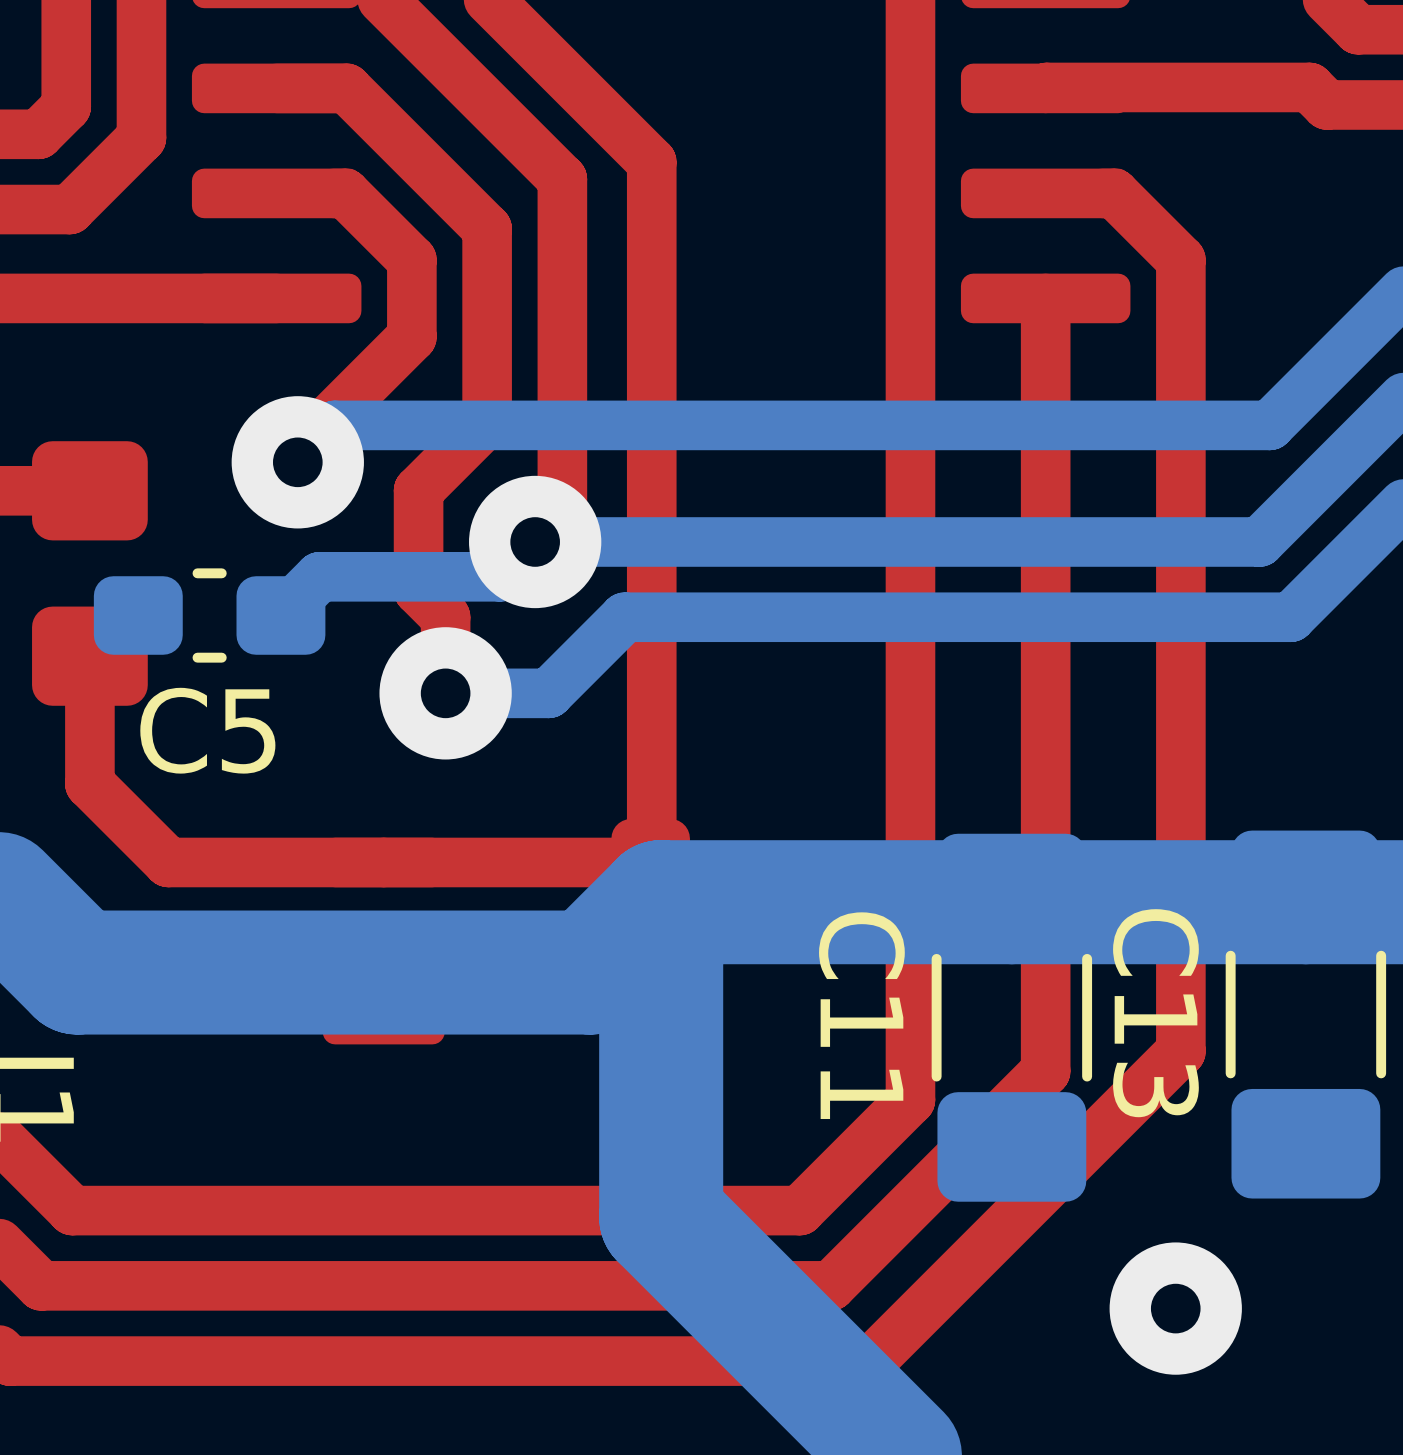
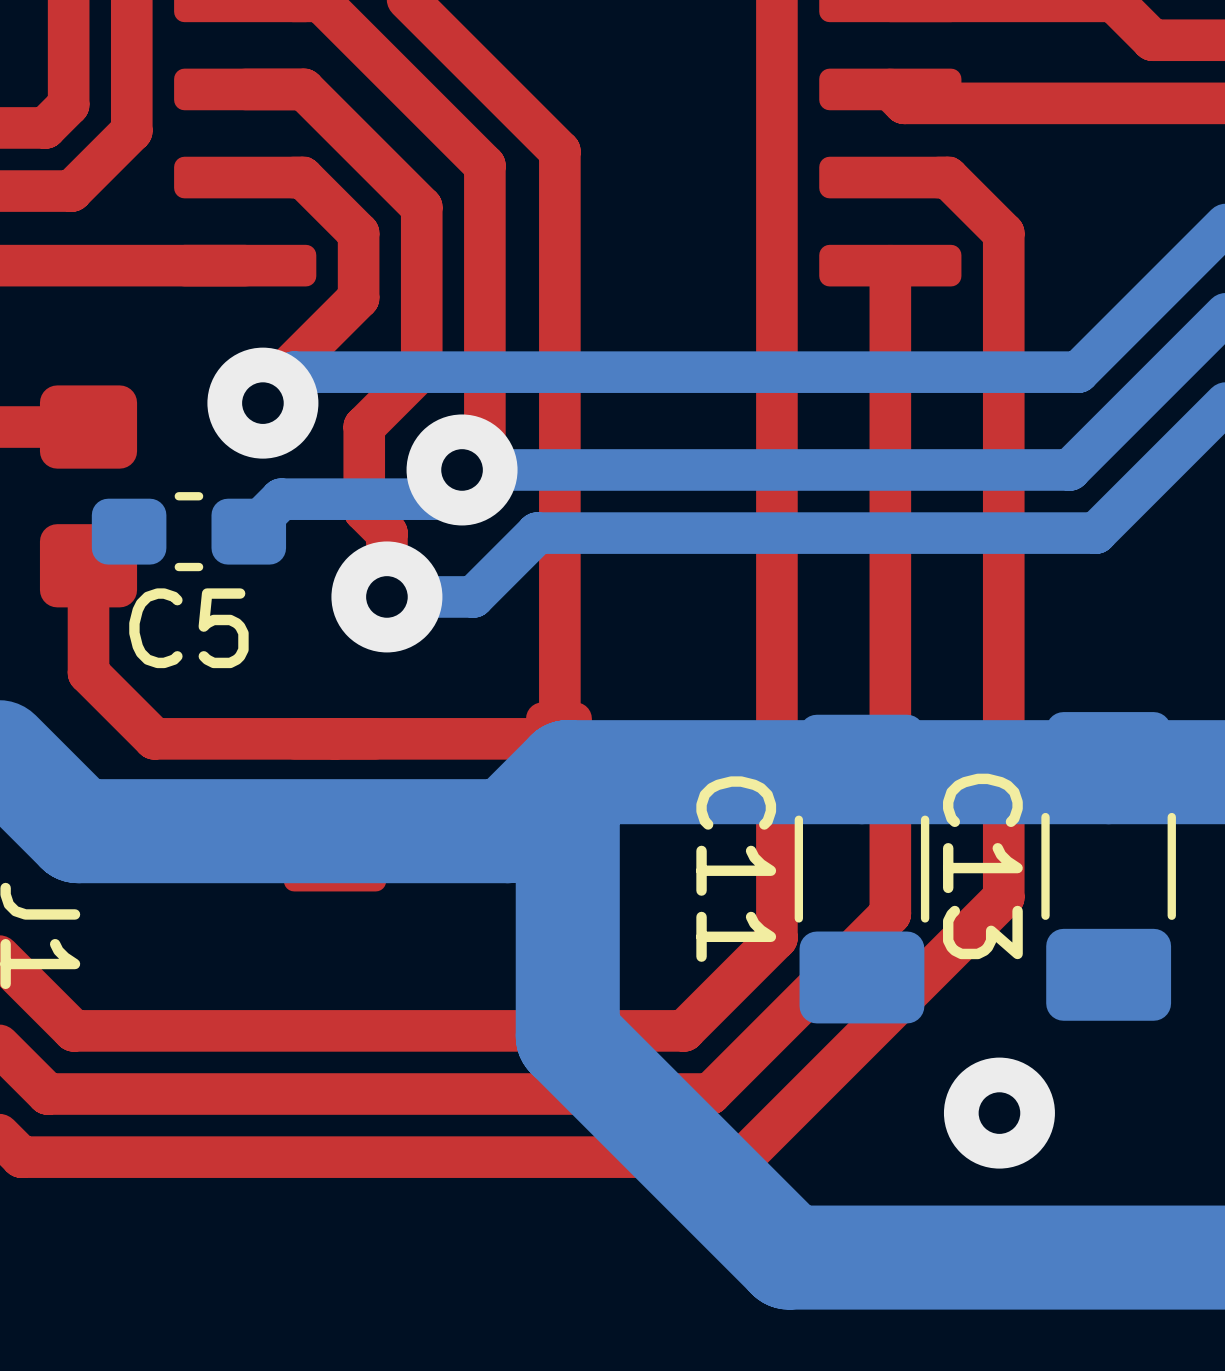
top track: (1046, 87) (1309, 87) (1327, 104) -> (890, 89) (904, 103) (1126, 103)

